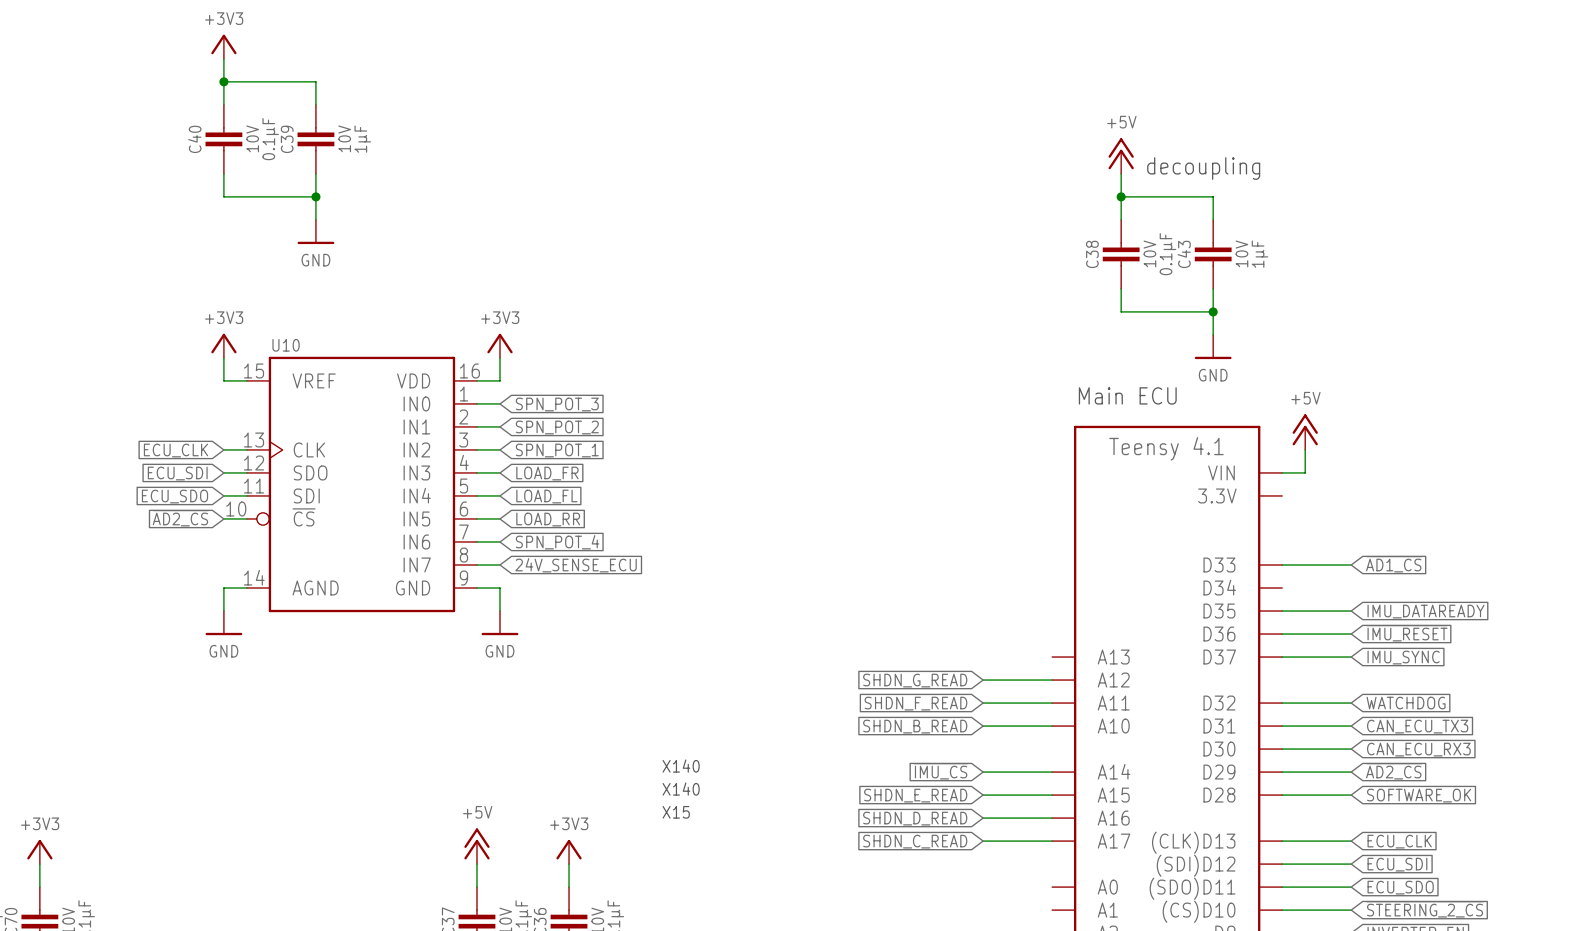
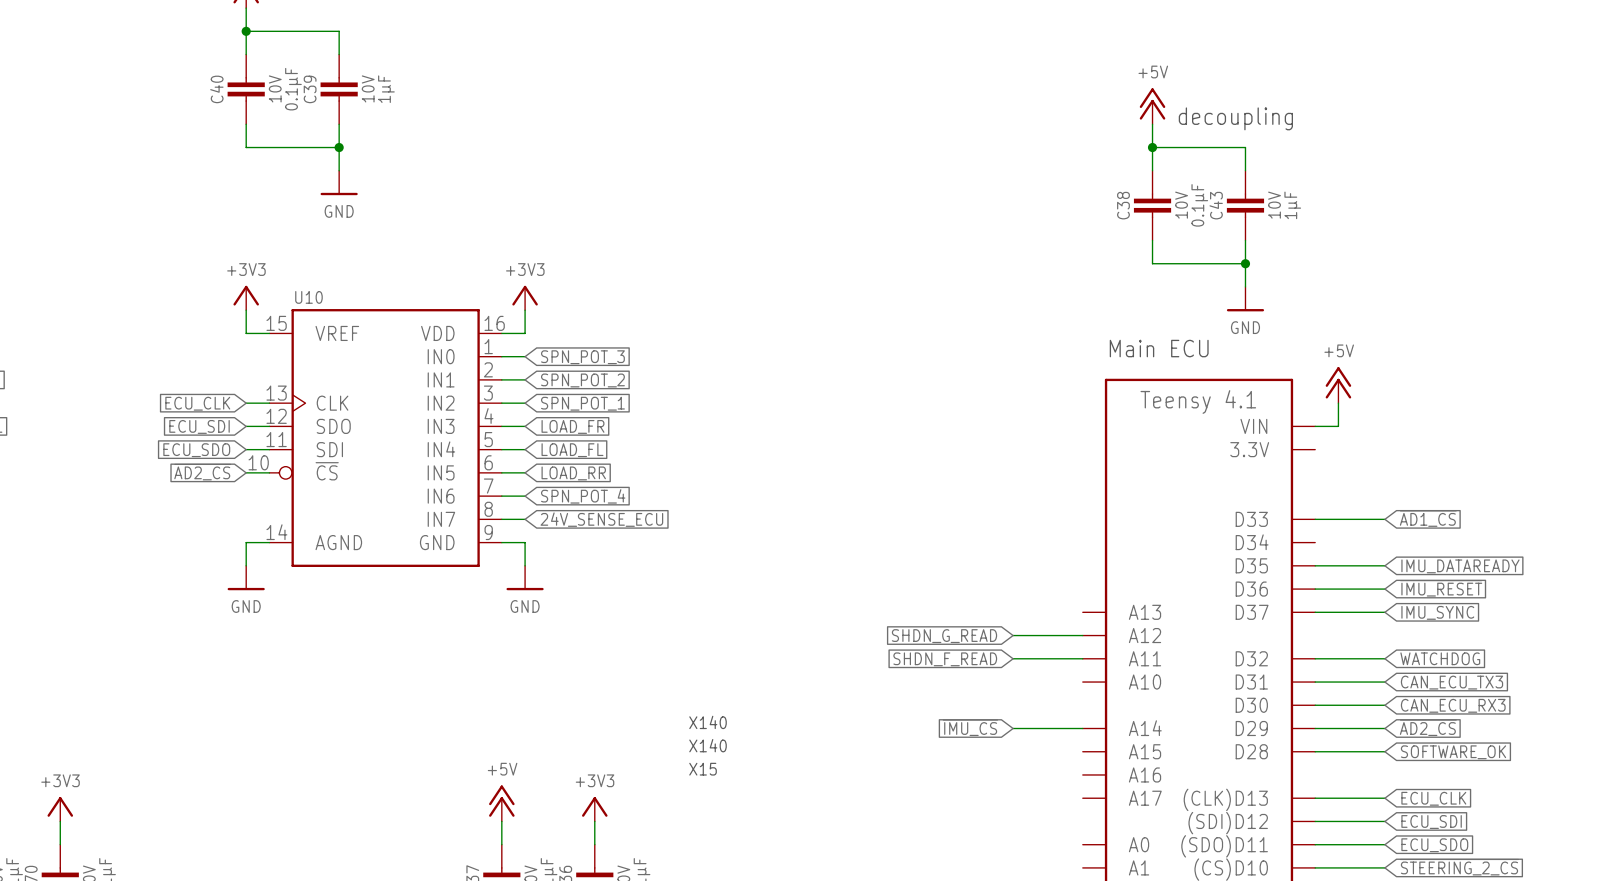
global label: SHDN_B_READ (915, 726) -> none
wire: (983, 726) (1052, 726) -> none
global label: SHDN_E_READ (915, 795) -> none
wire: (983, 795) (1052, 795) -> none
global label: SHDN_D_READ (915, 818) -> none
wire: (983, 818) (1052, 818) -> none
global label: SHDN_C_READ (915, 841) -> none
wire: (983, 841) (1052, 841) -> none

